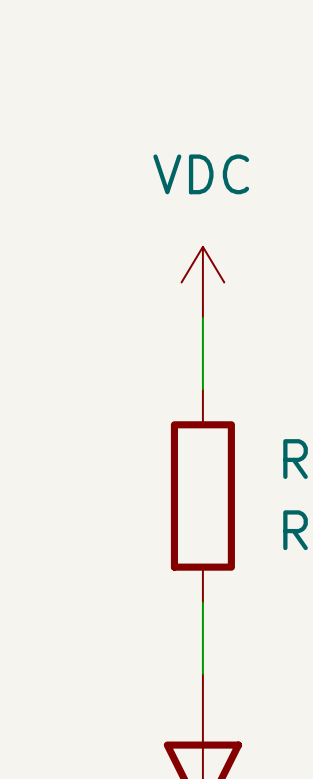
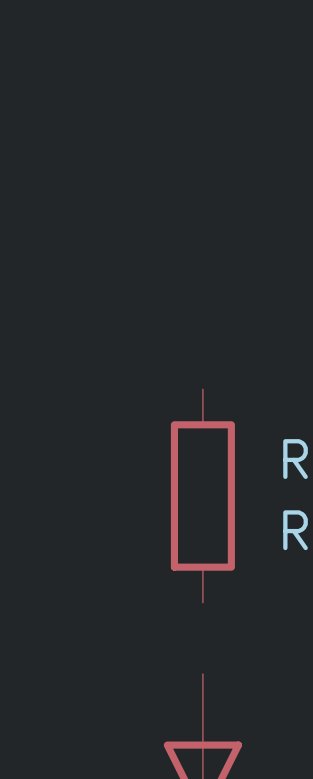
power symbol: VDC (202, 282) -> none
wire: (202, 318) (202, 389) -> none
wire: (202, 602) (202, 673) -> none

